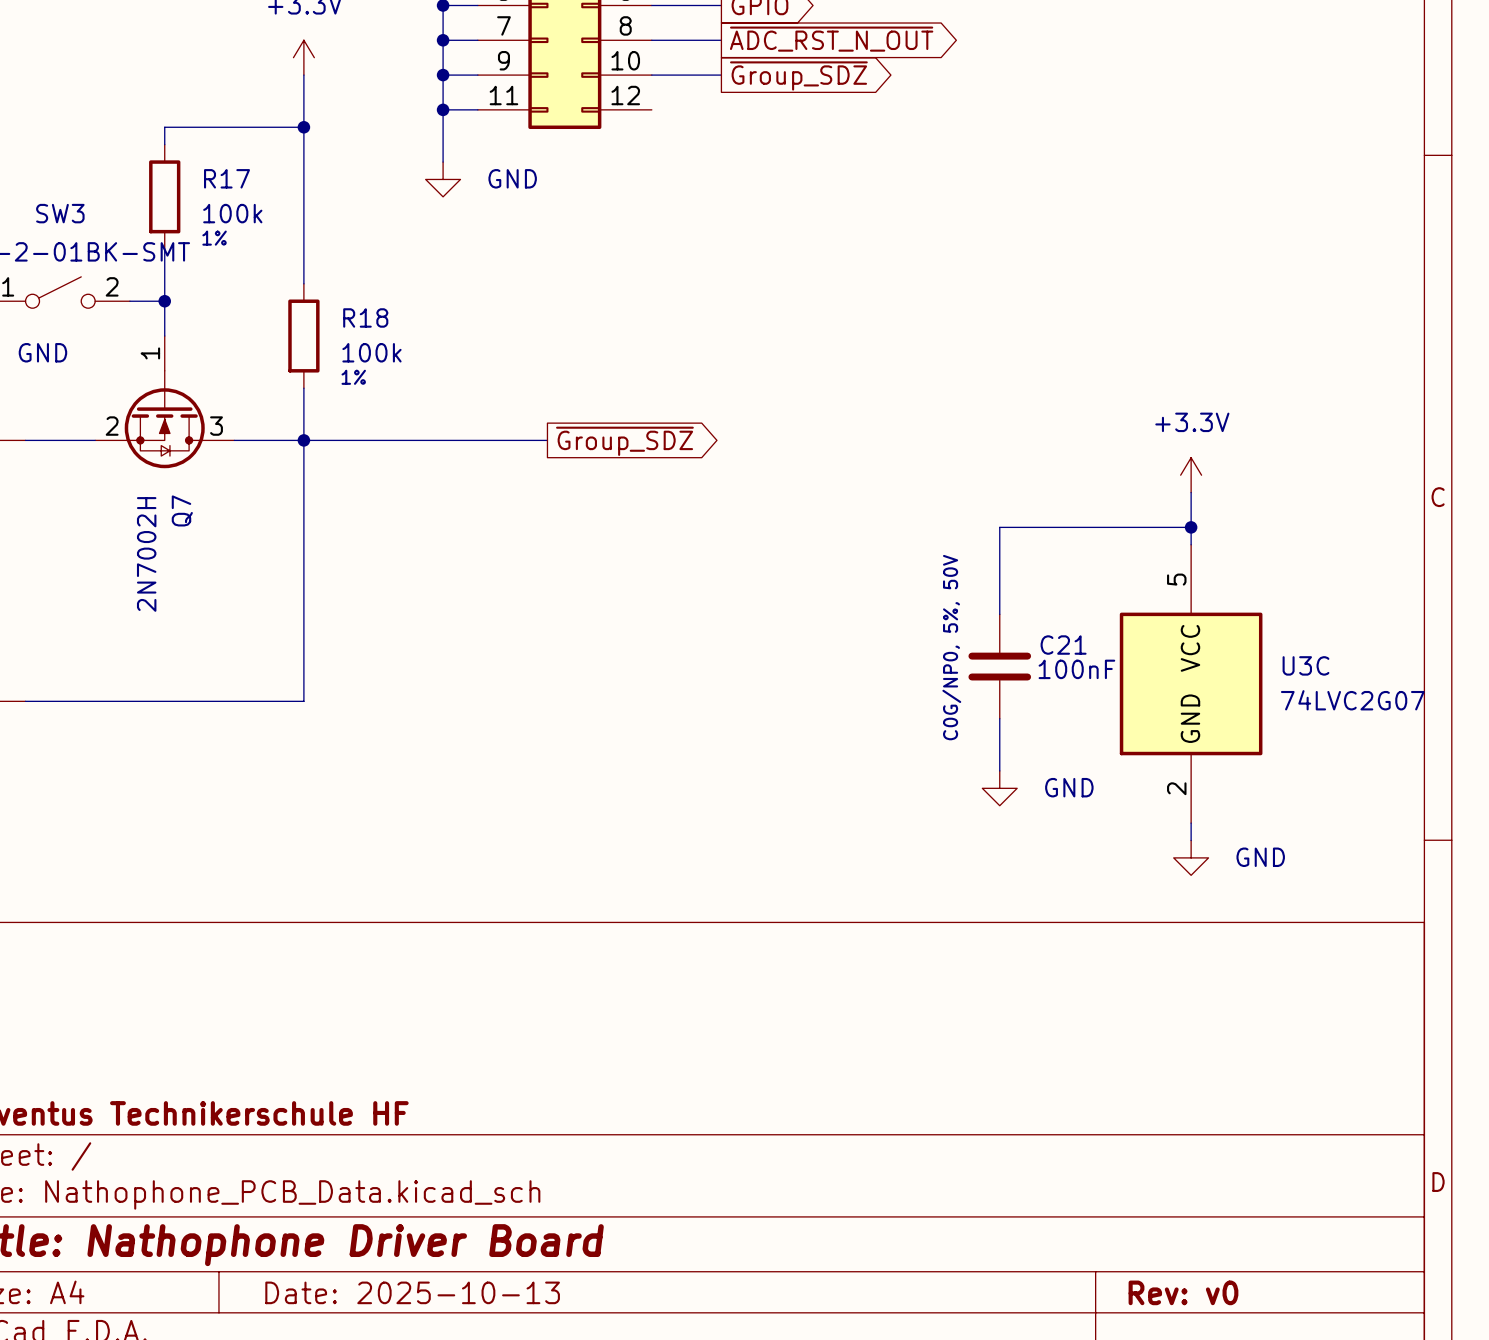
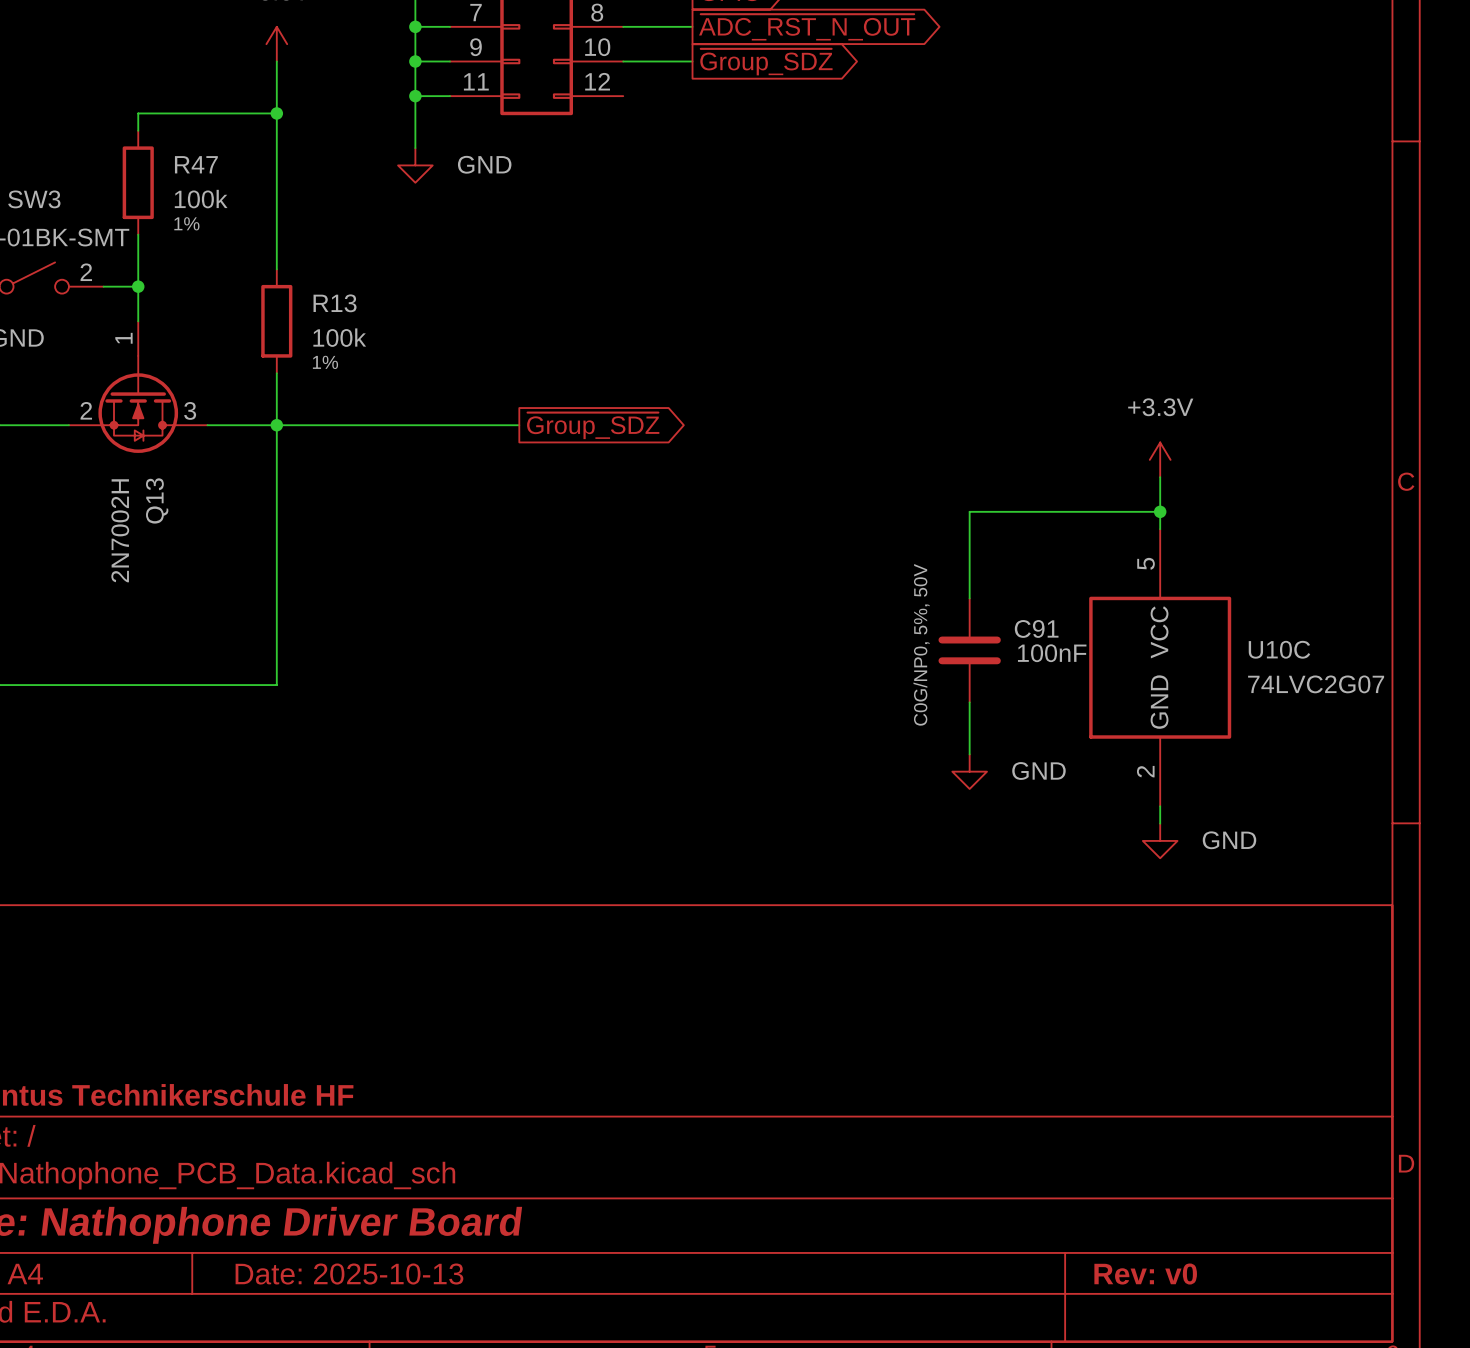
R17 name: R17 (226, 178) -> R47 (196, 164)
R18 name: R18 (365, 317) -> R13 (335, 303)
Q7 name: Q7 (182, 510) -> Q13 (157, 500)
C21 name: C21 (1063, 645) -> C91 (1036, 628)
U3C name: U3C (1305, 665) -> U10C (1279, 649)

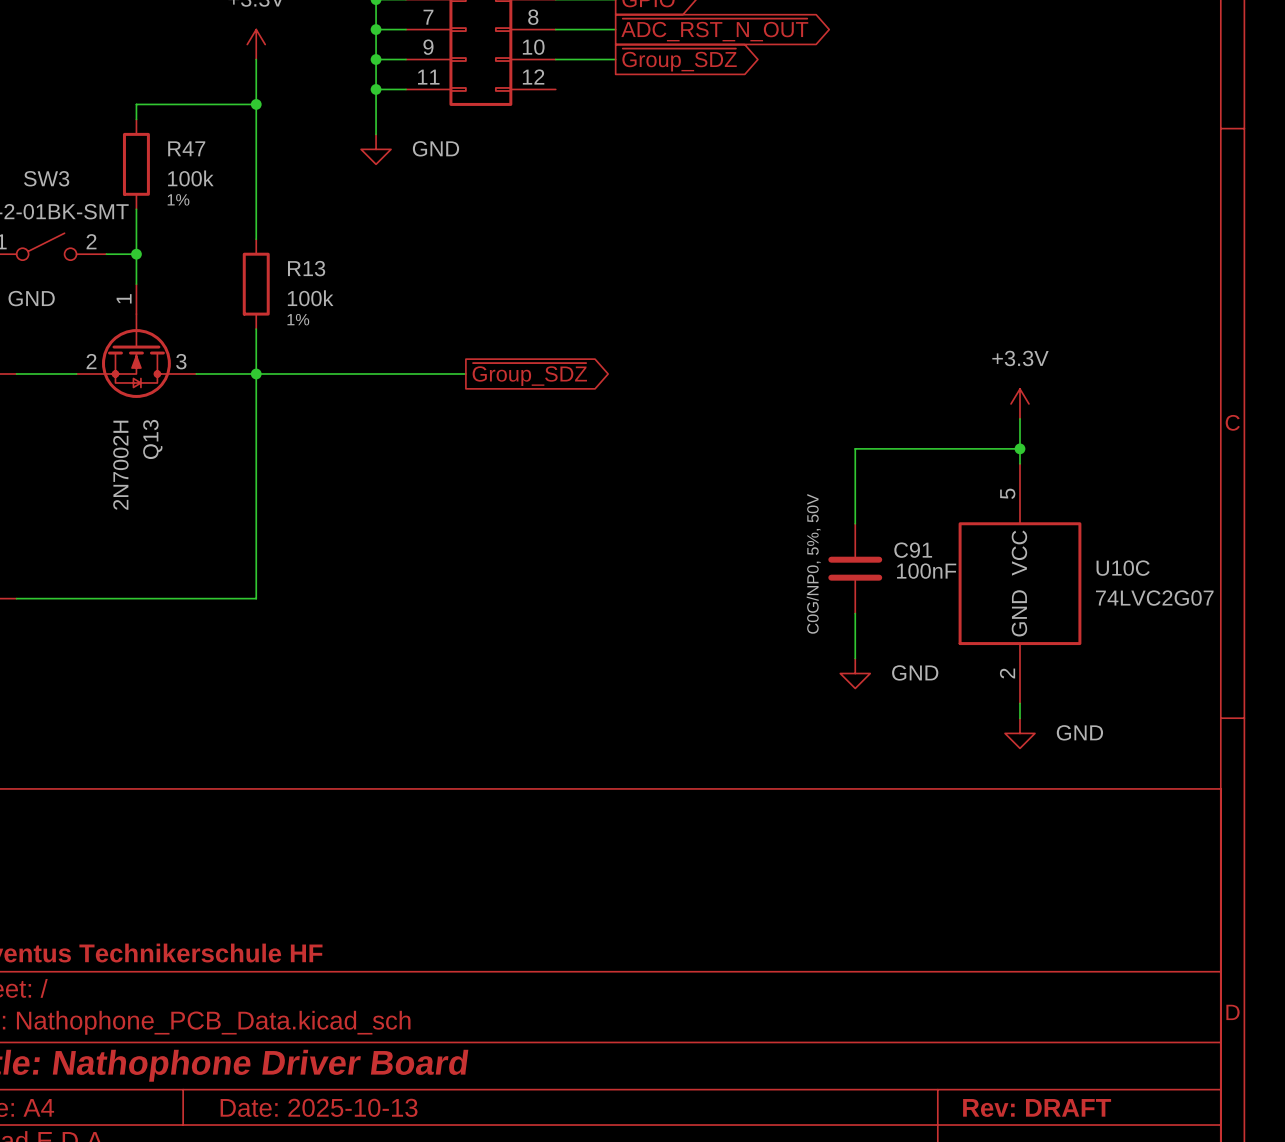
title block: Rev: v0 (1145, 1274) -> Rev: DRAFT (1037, 1107)

